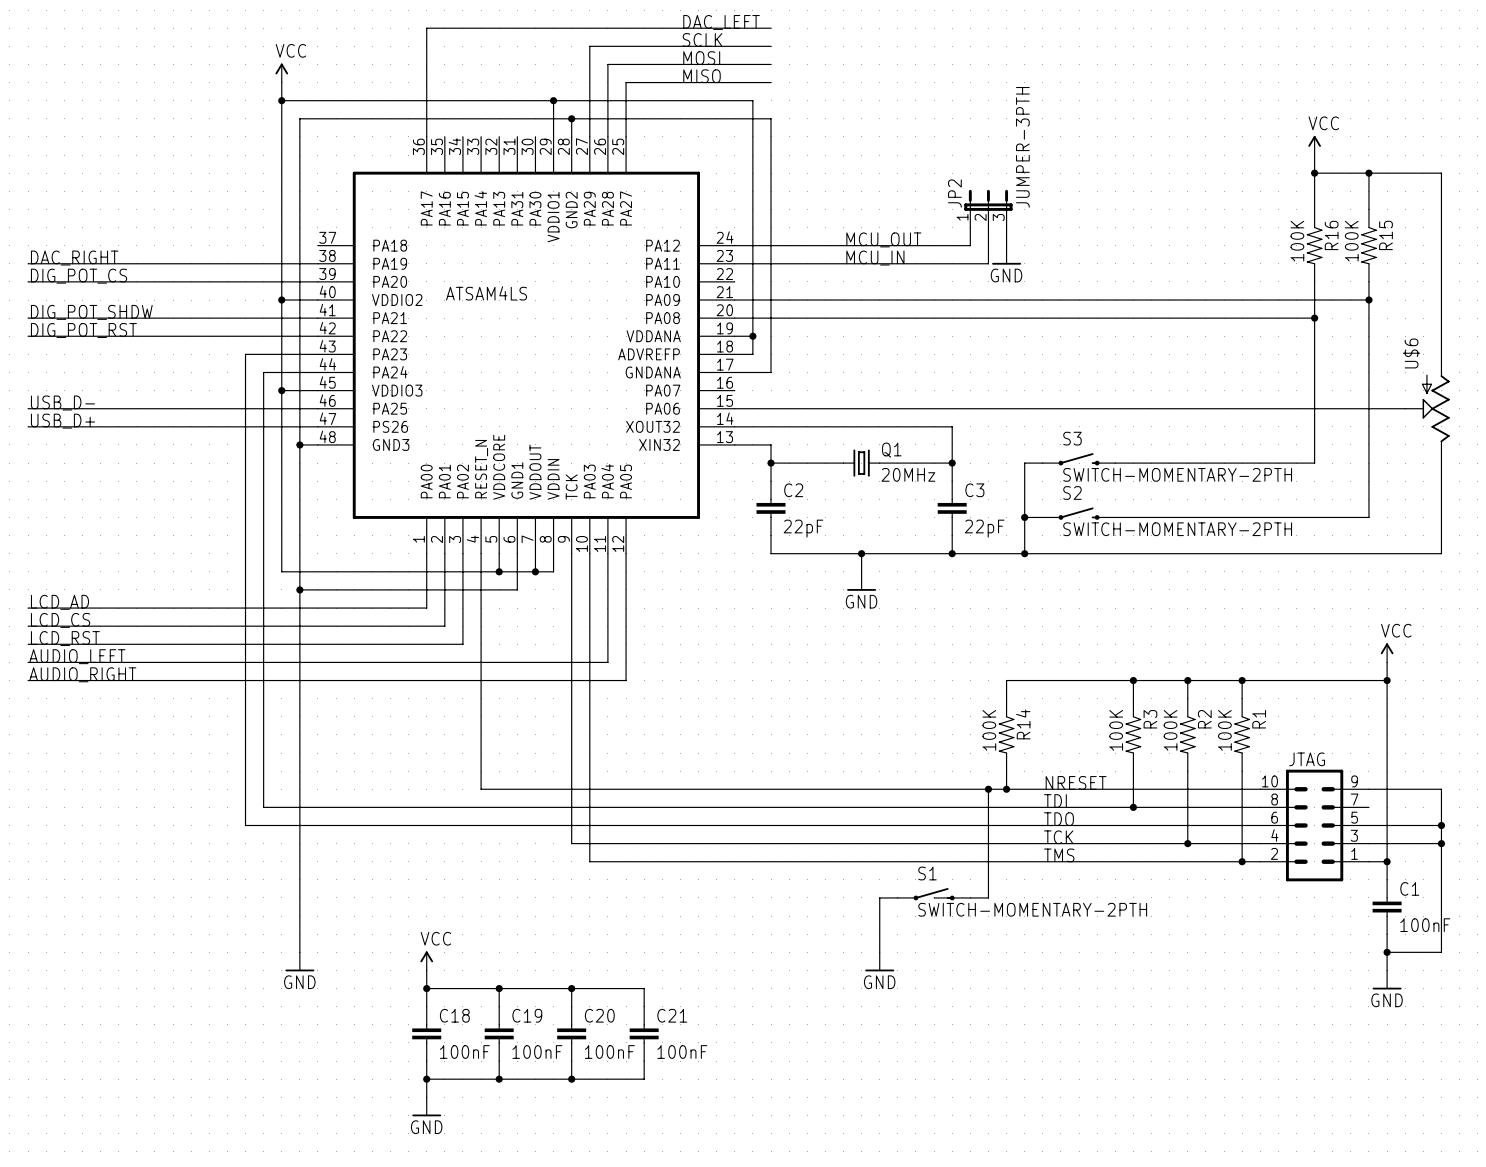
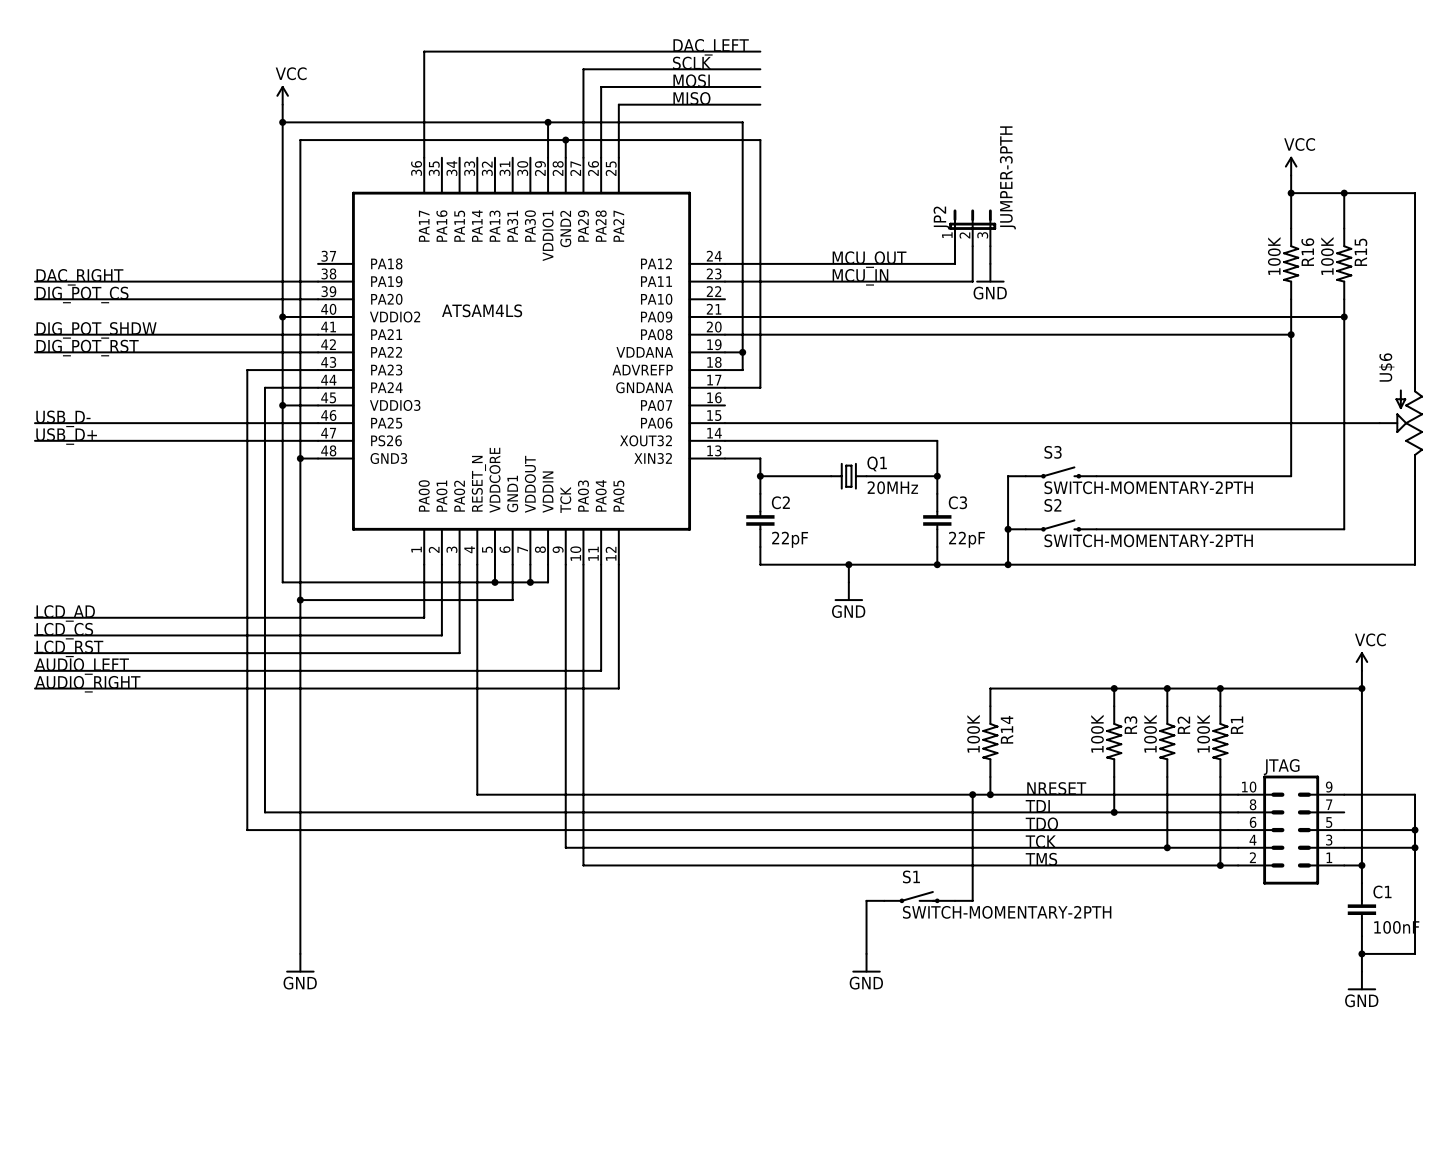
power symbol: VCC (426, 960) -> none
wire: (426, 970) (426, 1006) -> none
wire: (426, 988) (644, 988) (644, 1006) -> none
junction: (426, 988) -> none
wire: (499, 988) (499, 1006) -> none
junction: (499, 988) -> none
wire: (571, 988) (571, 1006) -> none
junction: (571, 988) -> none
C18: 100nF (426, 1033) -> none
C19: 100nF (499, 1033) -> none
C20: 100nF (571, 1033) -> none
C21: 100nF (644, 1033) -> none
wire: (426, 1061) (426, 1097) -> none
wire: (499, 1061) (499, 1079) -> none
wire: (571, 1061) (571, 1079) -> none
wire: (644, 1061) (644, 1079) (426, 1079) -> none
junction: (426, 1079) -> none
junction: (499, 1079) -> none
junction: (571, 1079) -> none
power symbol: GND (426, 1106) -> none

